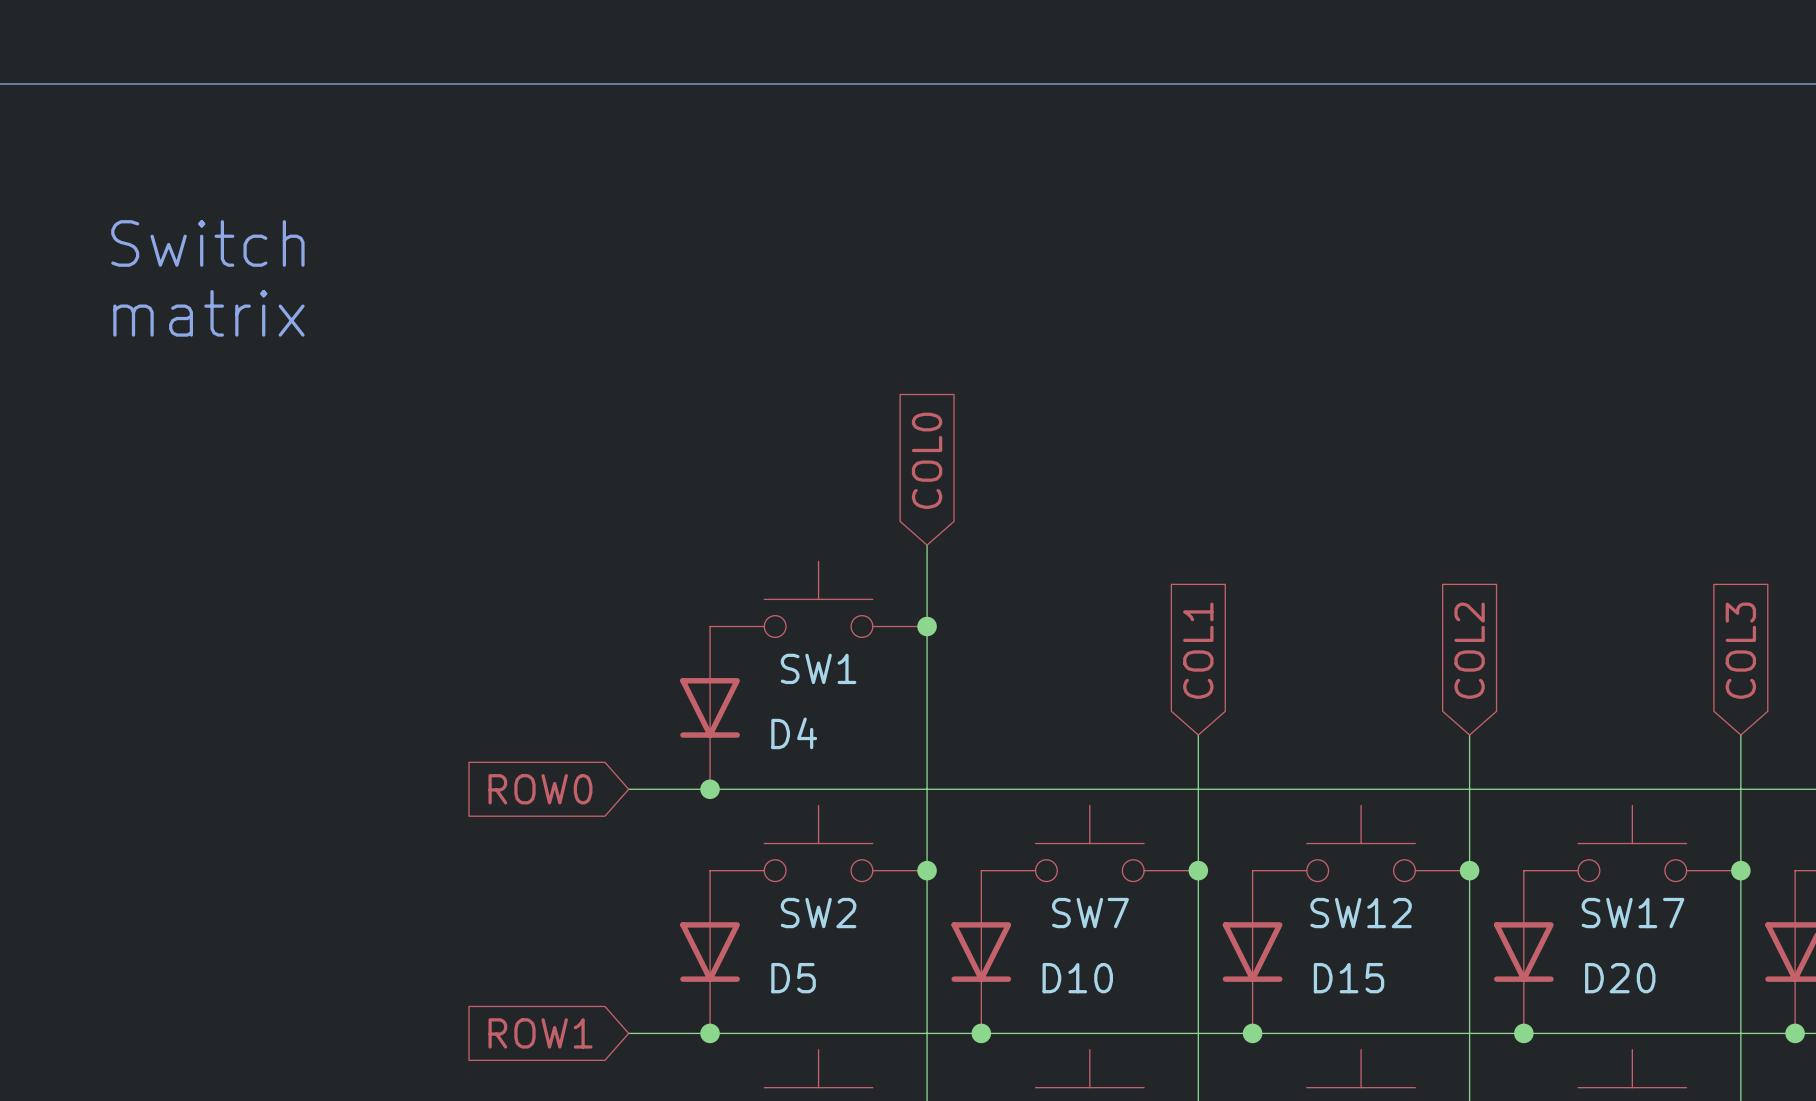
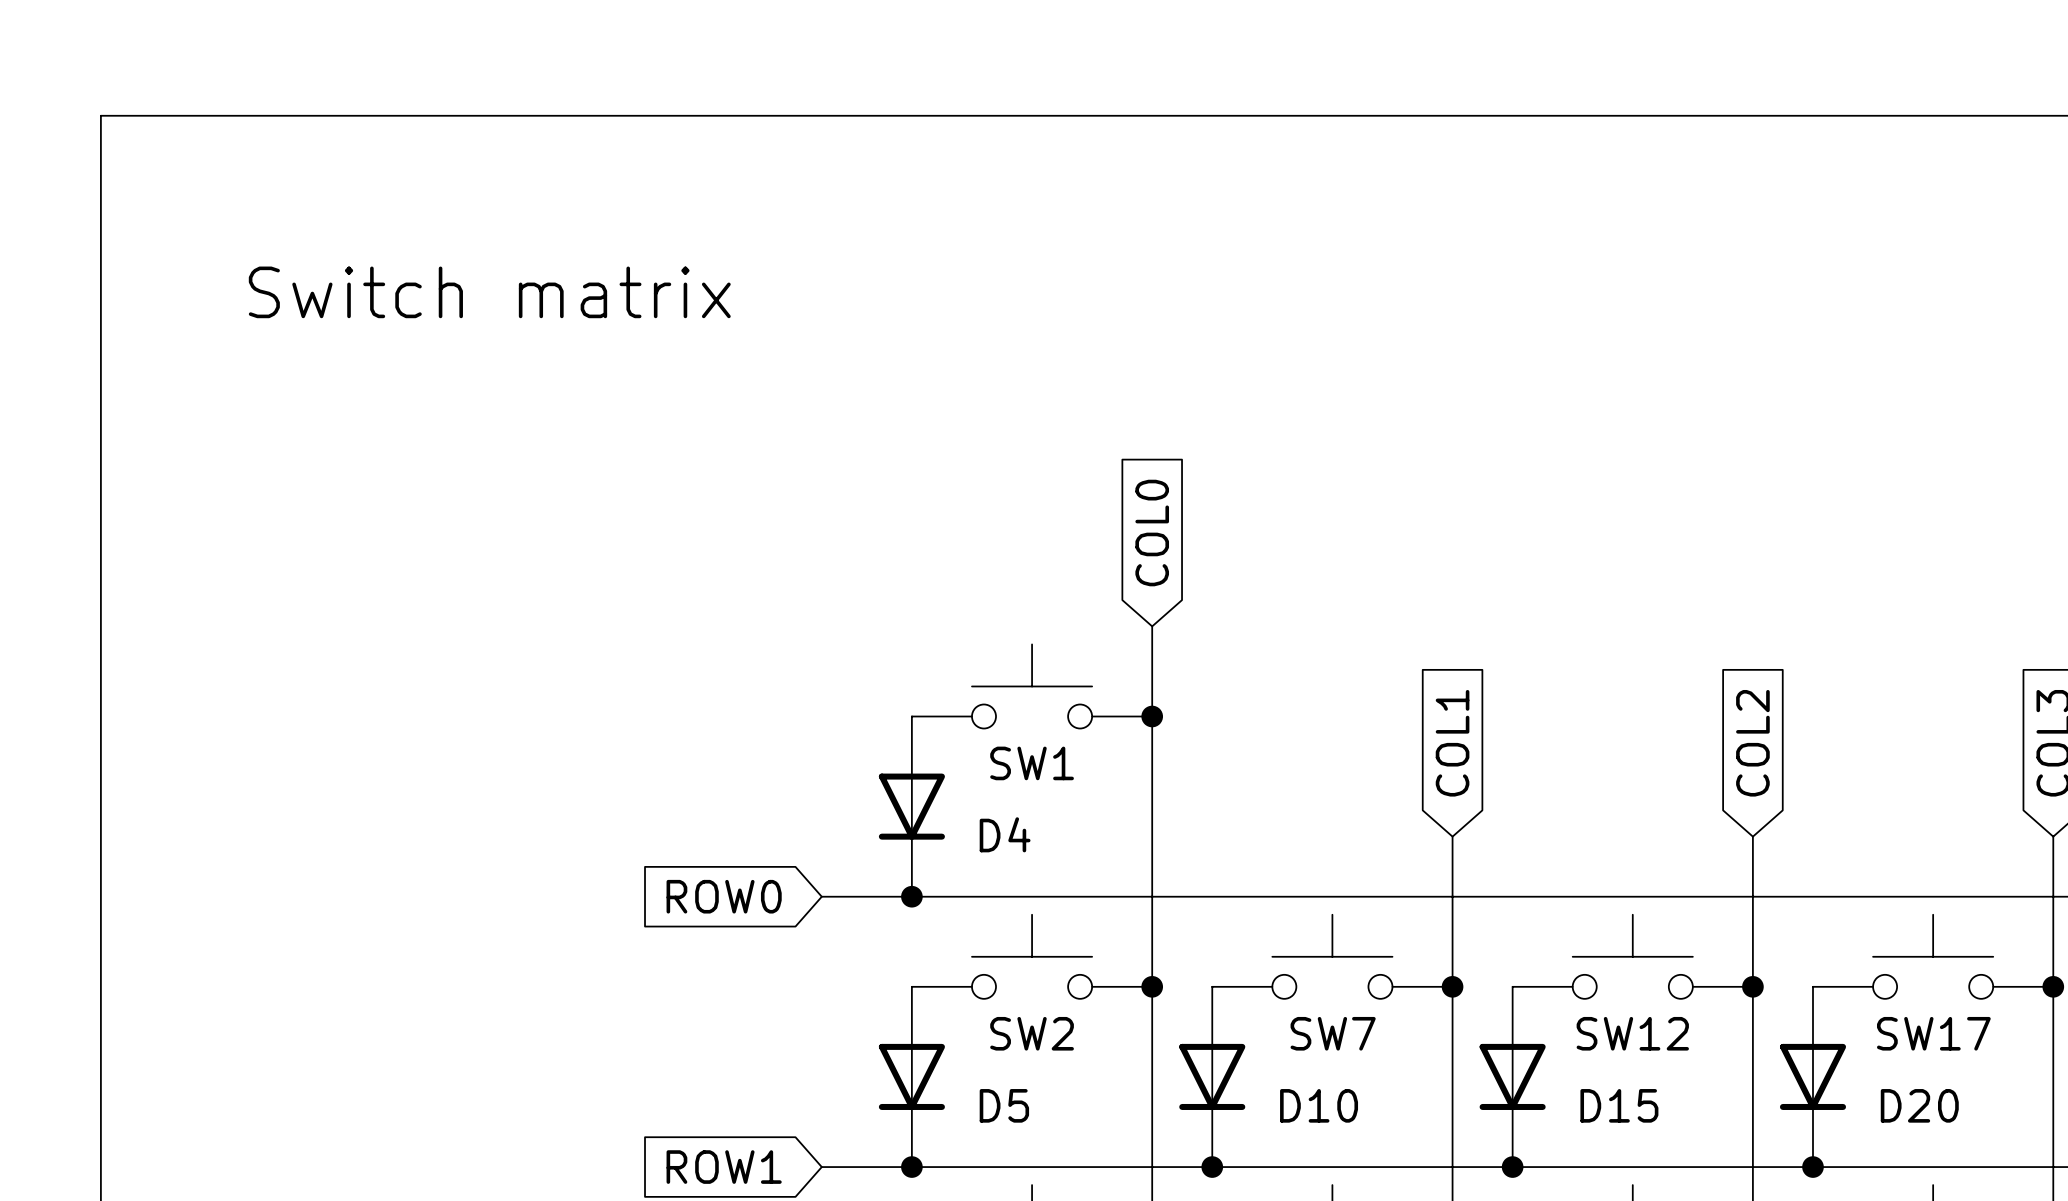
text: Switch (207, 243) -> Switch matrix (489, 292)
text: matrix (208, 313) -> none

